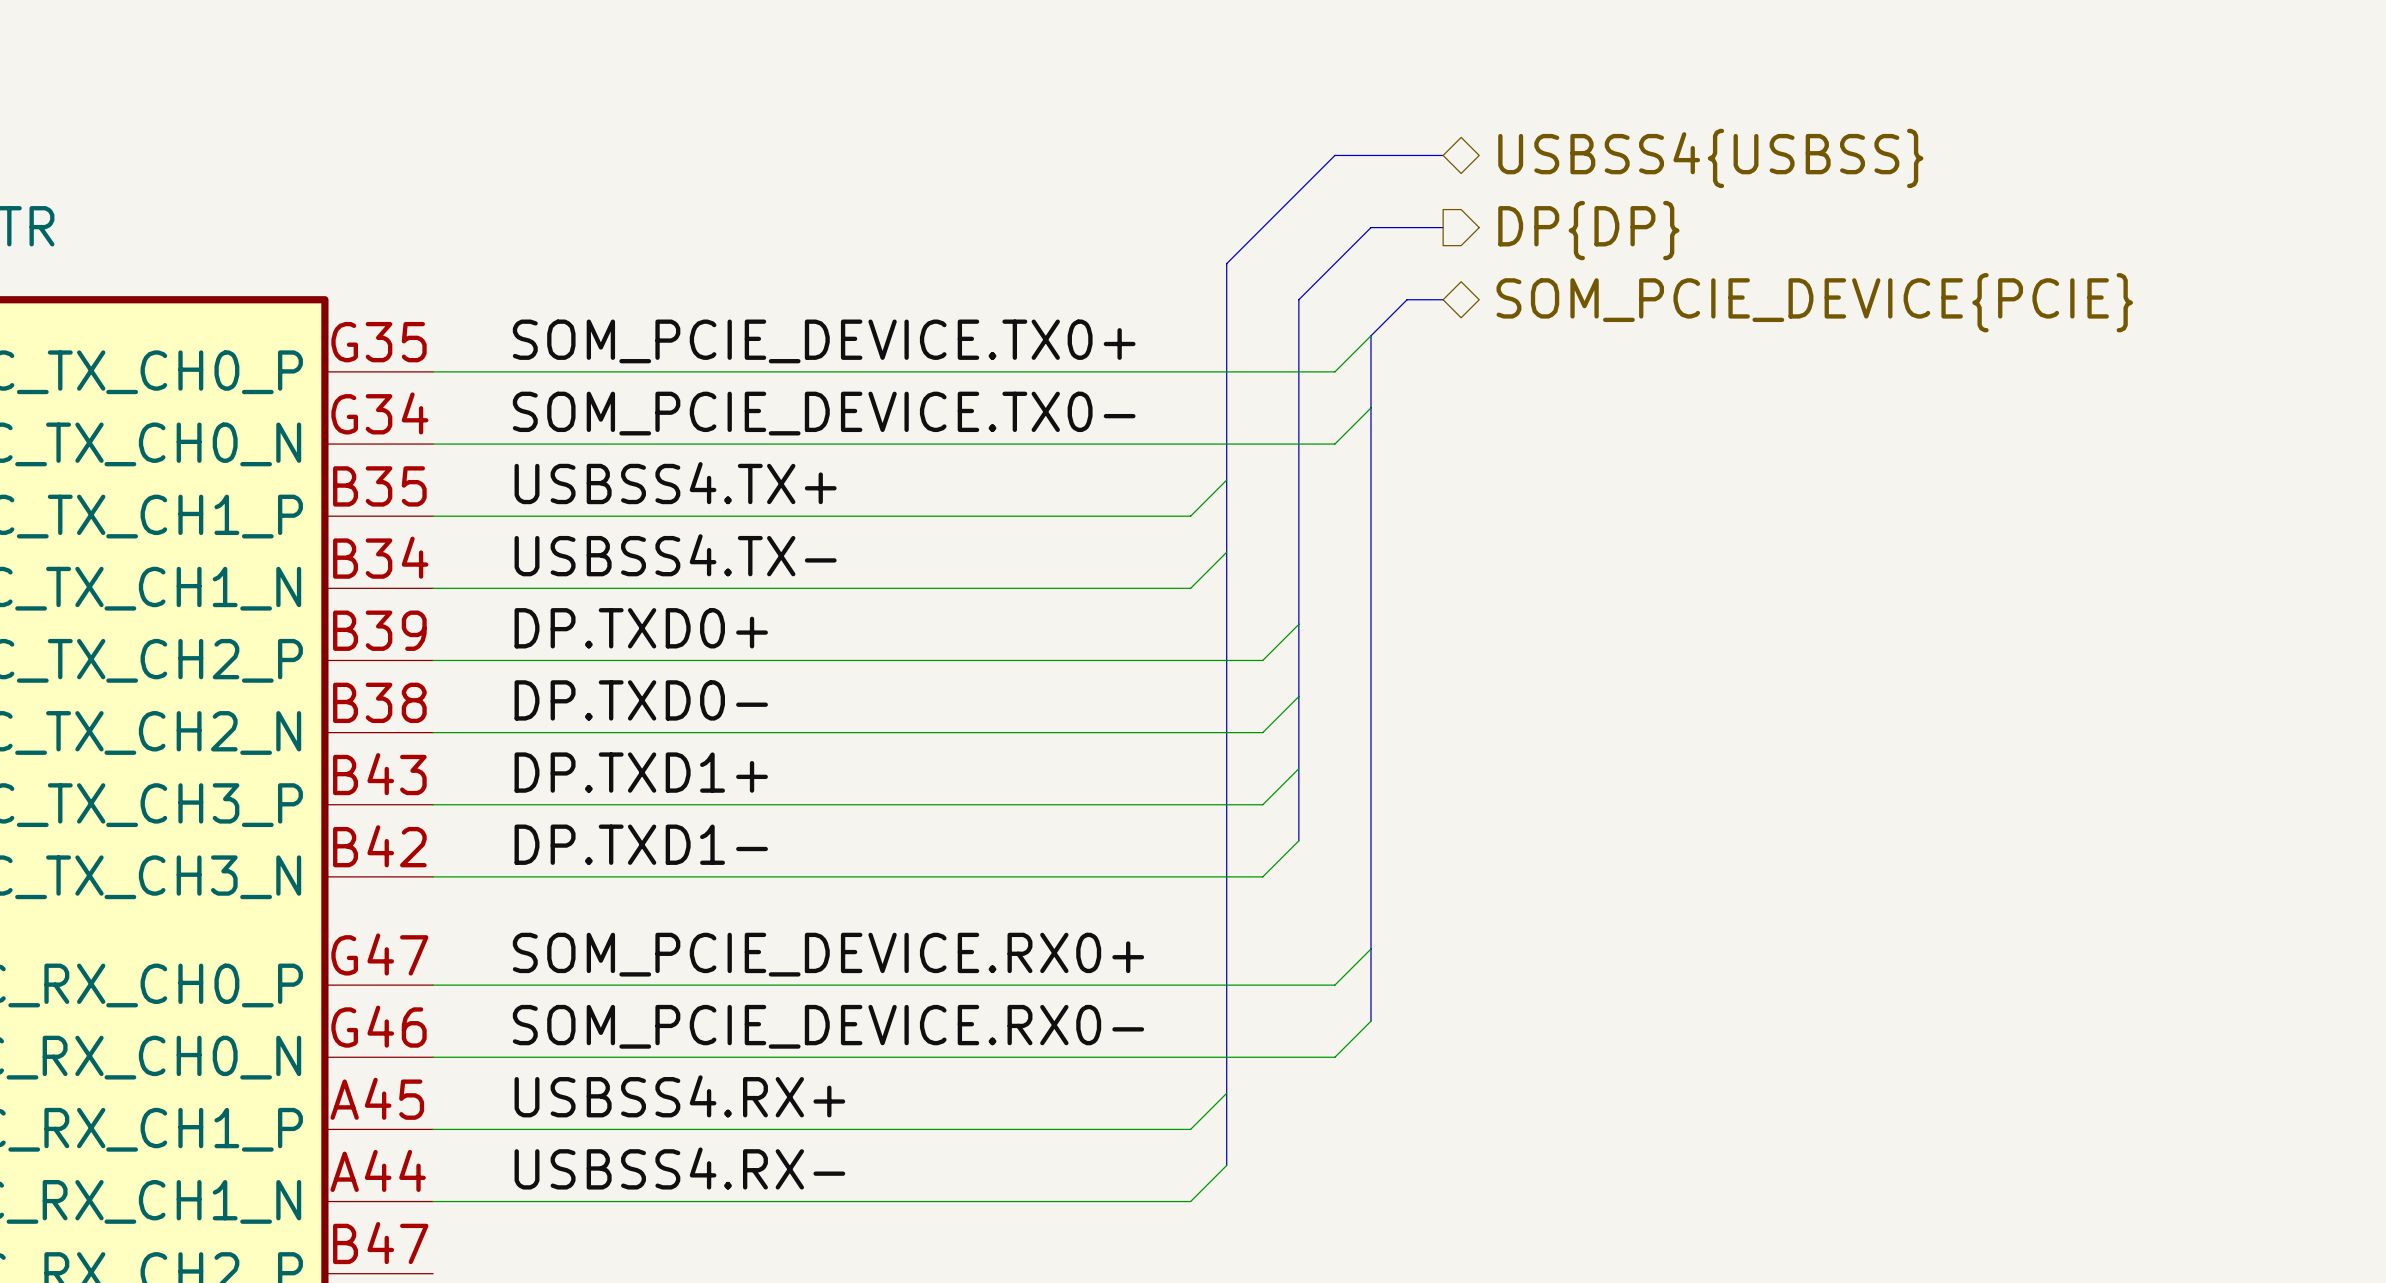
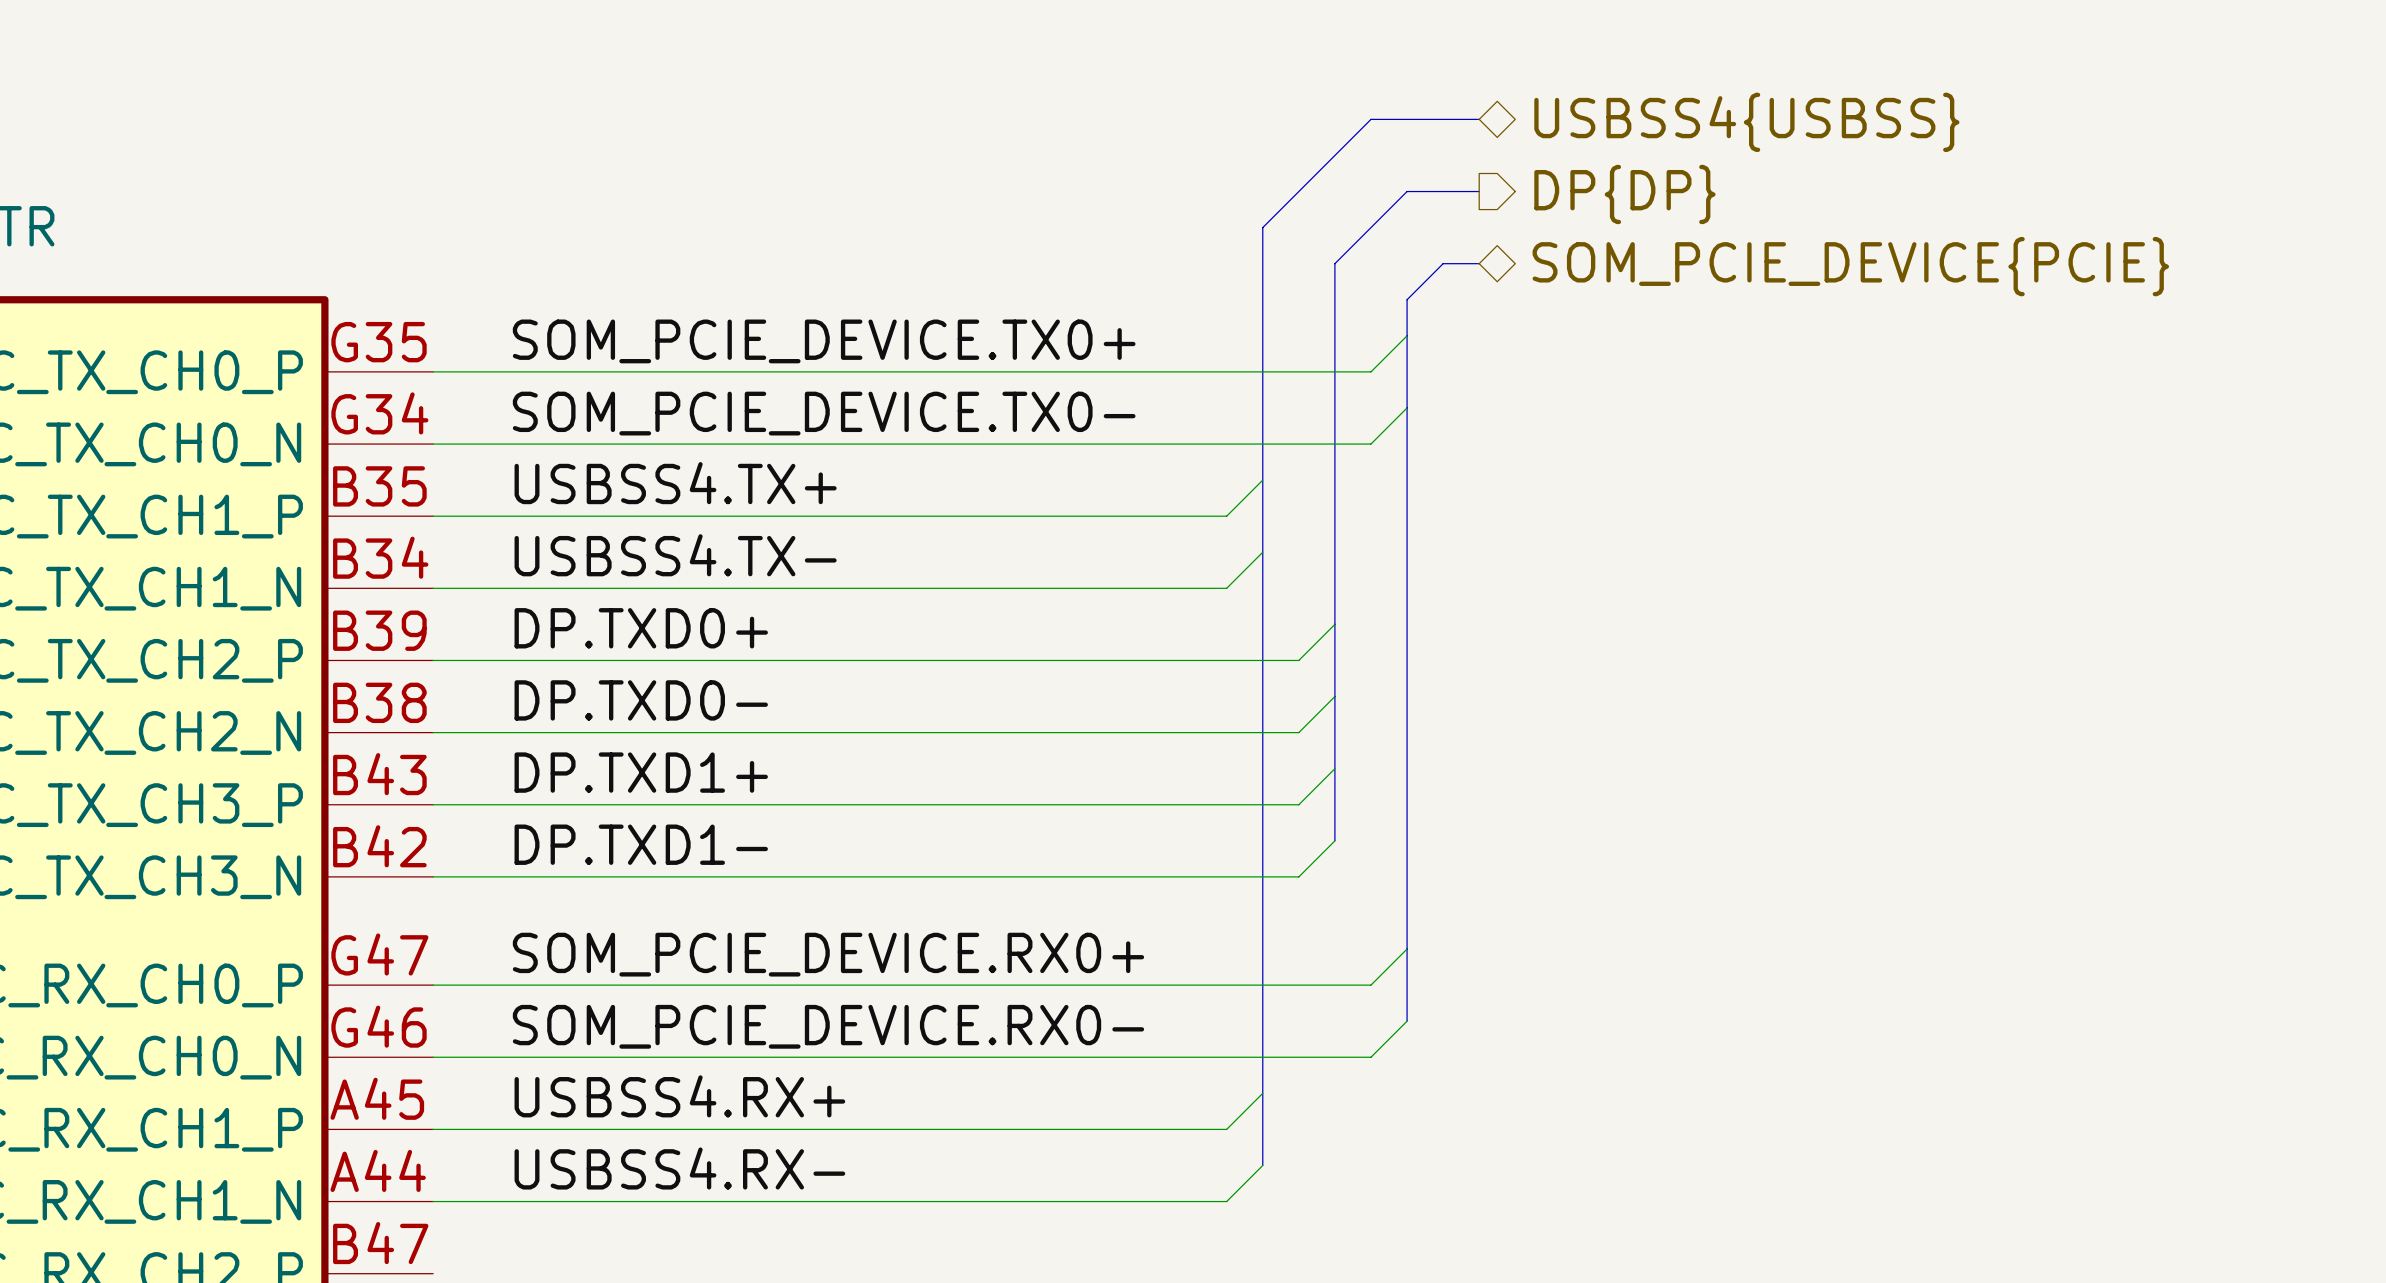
bus: (1334, 155) (1443, 155) -> (1334, 155) (1370, 119) (1479, 119)
hierarchical label position: USBSS4{USBSS} (1710, 158) -> USBSS4{USBSS} (1746, 122)
bus: (1262, 227) (1226, 263) (1226, 1165) -> (1262, 227) (1262, 1165)
bus: (1370, 227) (1443, 227) -> (1370, 227) (1407, 191) (1479, 191)
hierarchical label position: DP{DP} (1588, 230) -> DP{DP} (1624, 194)
bus: (1334, 263) (1298, 299) (1298, 840) -> (1334, 263) (1334, 840)
bus: none -> (1479, 263) (1443, 263) (1407, 299) (1407, 1021)
bus: (1443, 299) (1407, 299) (1370, 335) (1370, 1021) -> none
hierarchical label position: SOM_PCIE_DEVICE{PCIE} (1814, 302) -> SOM_PCIE_DEVICE{PCIE} (1850, 266)
wire: (1370, 335) (1334, 371) -> (1407, 335) (1370, 371) (1334, 371)
wire: (1370, 407) (1334, 444) -> (1407, 407) (1370, 444) (1334, 444)
wire: (1226, 480) (1190, 516) -> (1262, 480) (1226, 516) (1190, 516)
wire: (1226, 552) (1190, 588) -> (1262, 552) (1226, 588) (1190, 588)
wire: (1298, 624) (1262, 660) -> (1334, 624) (1298, 660) (1262, 660)
wire: (1298, 696) (1262, 732) -> (1334, 696) (1298, 732) (1262, 732)
wire: (1298, 768) (1262, 804) -> (1334, 768) (1298, 804) (1262, 804)
wire: (1298, 840) (1262, 876) -> (1334, 840) (1298, 876) (1262, 876)
wire: (1370, 949) (1334, 985) -> (1407, 949) (1370, 985) (1334, 985)
wire: (1370, 1021) (1334, 1057) -> (1407, 1021) (1370, 1057) (1334, 1057)
wire: (1226, 1093) (1190, 1129) -> (1262, 1093) (1226, 1129) (1190, 1129)
wire: (1226, 1165) (1190, 1201) -> (1262, 1165) (1226, 1201) (1190, 1201)

